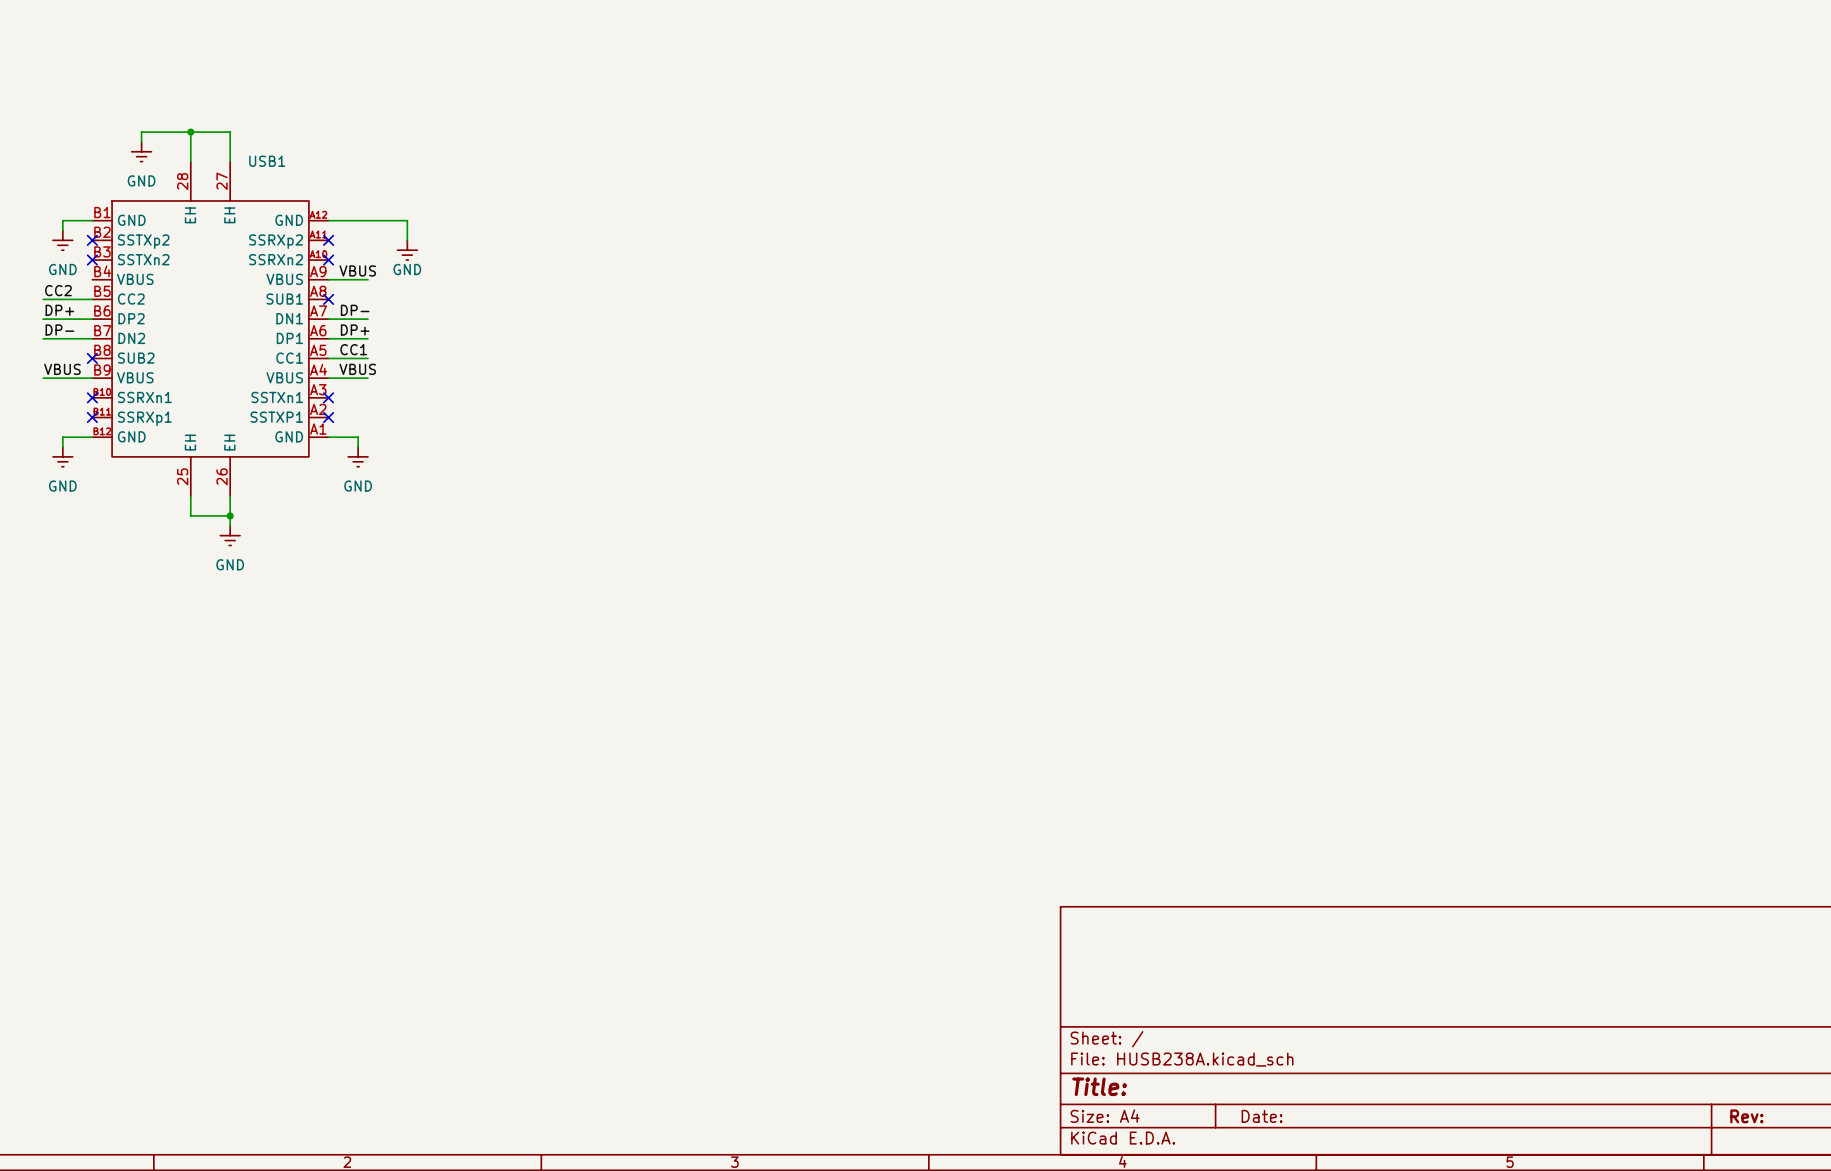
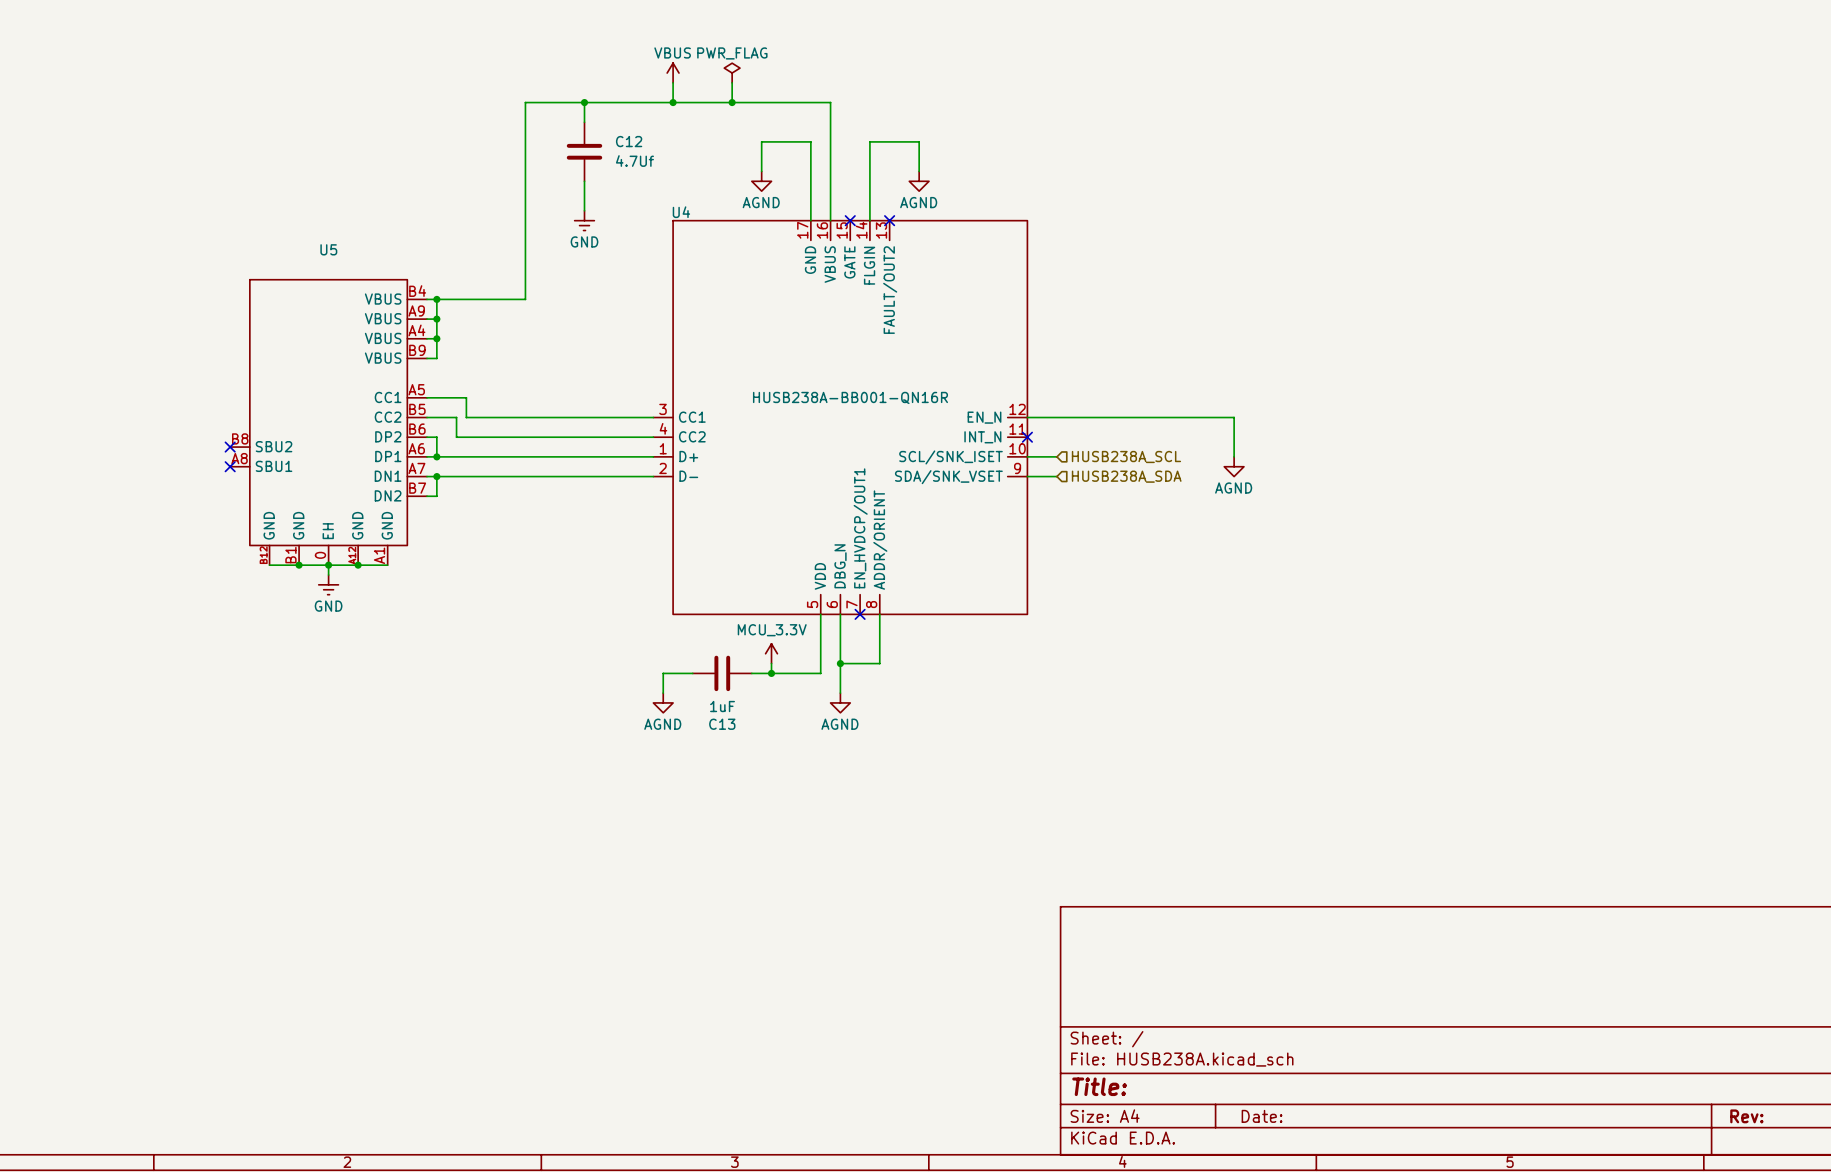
power symbol: none -> VBUS (673, 73)
power symbol: none -> PWR_FLAG (732, 73)
wire: none -> (673, 82) (673, 102)
wire: none -> (732, 82) (732, 102)
wire: none -> (584, 102) (584, 122)
junction: none -> (584, 102)
junction: none -> (673, 102)
junction: none -> (732, 102)
wire: (190, 132) (190, 161) -> none
junction: (190, 132) -> none
wire: (141, 141) (141, 132) (230, 132) (230, 161) -> none
power symbol: GND (141, 151) -> none
C12: none -> 4.7Uf (584, 151)
wire: none -> (761, 171) (761, 141) (810, 141) (810, 220)
wire: none -> (919, 171) (919, 141) (869, 141) (869, 220)
wire: none -> (584, 181) (584, 210)
power symbol: none -> AGND (761, 181)
power symbol: none -> AGND (919, 181)
wire: (92, 220) (62, 220) (62, 230) -> none
wire: (328, 220) (407, 220) (407, 240) -> none
power symbol: none -> GND (584, 220)
wire: none -> (830, 220) (830, 102) (525, 102) (525, 299) (427, 299)
no-connect mark: none -> (850, 220)
no-connect mark: none -> (889, 220)
power symbol: GND (62, 240) -> none
no-connect mark: (92, 240) -> none
no-connect mark: (328, 240) -> none
power symbol: GND (407, 250) -> none
no-connect mark: (92, 260) -> none
no-connect mark: (328, 260) -> none
label: VBUS (357, 270) -> none
label: CC2 (58, 290) -> none
wire: (43, 299) (92, 299) -> none
no-connect mark: (328, 299) -> none
wire: none -> (436, 299) (436, 358) (427, 358)
junction: none -> (436, 299)
label: DP+ (59, 310) -> none
label: DP- (355, 310) -> none
wire: (43, 319) (92, 319) -> none
wire: (328, 319) (367, 319) -> none
wire: none -> (427, 319) (436, 319)
junction: none -> (436, 319)
USB1: (210, 328) -> none
label: DP- (59, 330) -> none
label: DP+ (355, 330) -> none
wire: (43, 338) (92, 338) -> none
wire: (328, 338) (367, 338) -> none
wire: none -> (427, 338) (436, 338)
junction: none -> (436, 338)
label: CC1 (353, 349) -> none
no-connect mark: (92, 358) -> none
wire: (328, 358) (367, 358) -> none
label: VBUS (62, 369) -> none
label: VBUS (357, 369) -> none
wire: (43, 378) (92, 378) -> none
wire: (328, 378) (367, 378) -> none
no-connect mark: (92, 397) -> none
no-connect mark: (328, 397) -> none
wire: none -> (427, 397) (466, 397) (466, 417) (653, 417)
no-connect mark: (92, 417) -> none
no-connect mark: (328, 417) -> none
wire: none -> (427, 417) (456, 417) (456, 437) (653, 437)
U4: none -> HUSB238A-BB001-QN16R (840, 417)
wire: none -> (1027, 417) (1234, 417) (1234, 456)
U5: none -> (328, 422)
wire: (92, 437) (62, 437) (62, 447) -> none
wire: (328, 437) (358, 437) (358, 447) -> none
wire: none -> (427, 437) (436, 437) (436, 456)
no-connect mark: none -> (1027, 437)
no-connect mark: none -> (230, 447)
power symbol: GND (62, 456) -> none
power symbol: GND (358, 456) -> none
wire: none -> (427, 456) (653, 456)
junction: none -> (436, 456)
wire: none -> (1027, 456) (1056, 456)
hierarchical label: none -> HUSB238A_SCL (1126, 456)
no-connect mark: none -> (230, 466)
power symbol: none -> AGND (1234, 466)
wire: none -> (427, 476) (653, 476)
wire: none -> (436, 476) (436, 496) (427, 496)
junction: none -> (436, 476)
wire: none -> (1027, 476) (1056, 476)
hierarchical label: none -> HUSB238A_SDA (1126, 476)
wire: (190, 496) (190, 515) (230, 515) -> none
wire: (230, 496) (230, 525) -> none
junction: (230, 515) -> none
power symbol: GND (230, 535) -> none
wire: none -> (269, 565) (387, 565)
junction: none -> (299, 565)
wire: none -> (328, 565) (328, 575)
junction: none -> (328, 565)
junction: none -> (358, 565)
power symbol: none -> GND (328, 584)
wire: none -> (820, 614) (820, 673) (751, 673)
wire: none -> (840, 614) (840, 693)
no-connect mark: none -> (860, 614)
wire: none -> (879, 614) (879, 663) (840, 663)
power symbol: none -> MCU_3.3V (771, 653)
wire: none -> (771, 663) (771, 673)
junction: none -> (840, 663)
wire: none -> (692, 673) (663, 673) (663, 693)
C13: none -> 1uF (722, 673)
junction: none -> (771, 673)
power symbol: none -> AGND (663, 702)
power symbol: none -> AGND (840, 702)

